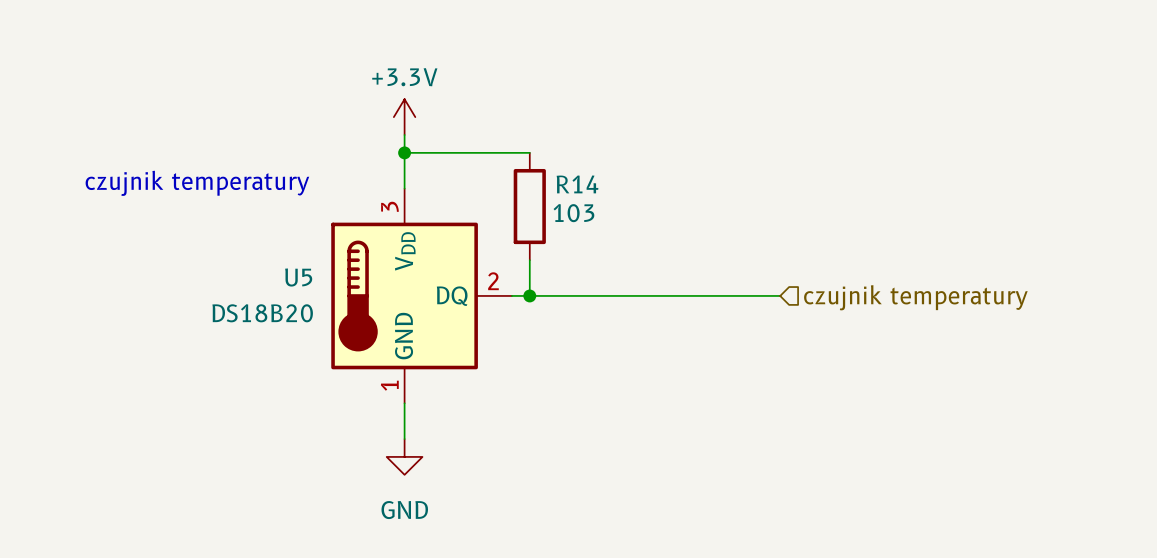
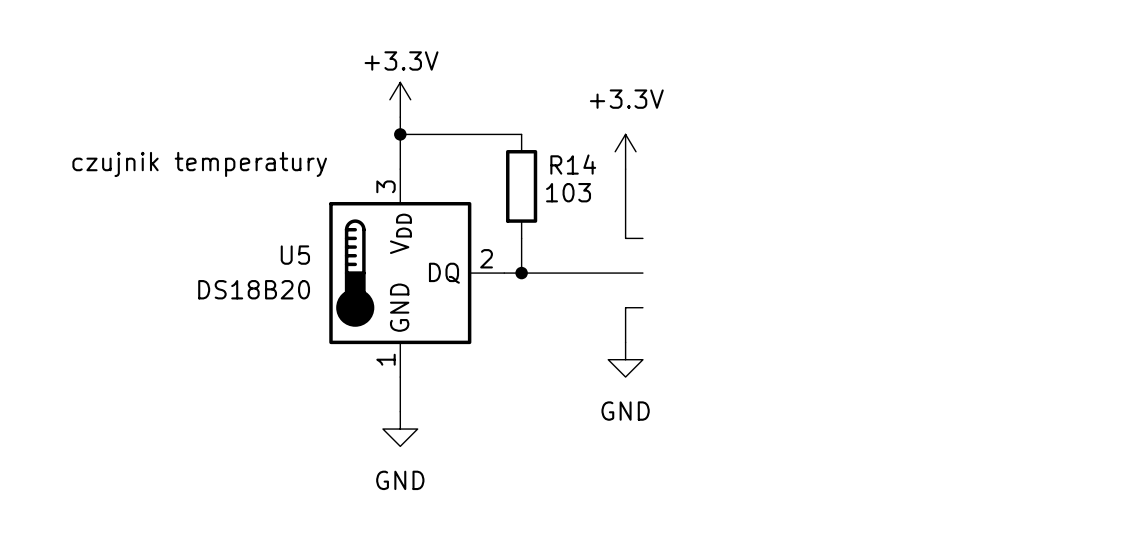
power symbol: none -> +3.3V (625, 151)
wire: none -> (625, 169) (625, 238) (642, 238)
wire: (654, 295) (780, 295) -> none
hierarchical label: czujnik temperatury (915, 297) -> none
wire: none -> (642, 307) (625, 307) (625, 342)
power symbol: none -> GND (625, 359)

